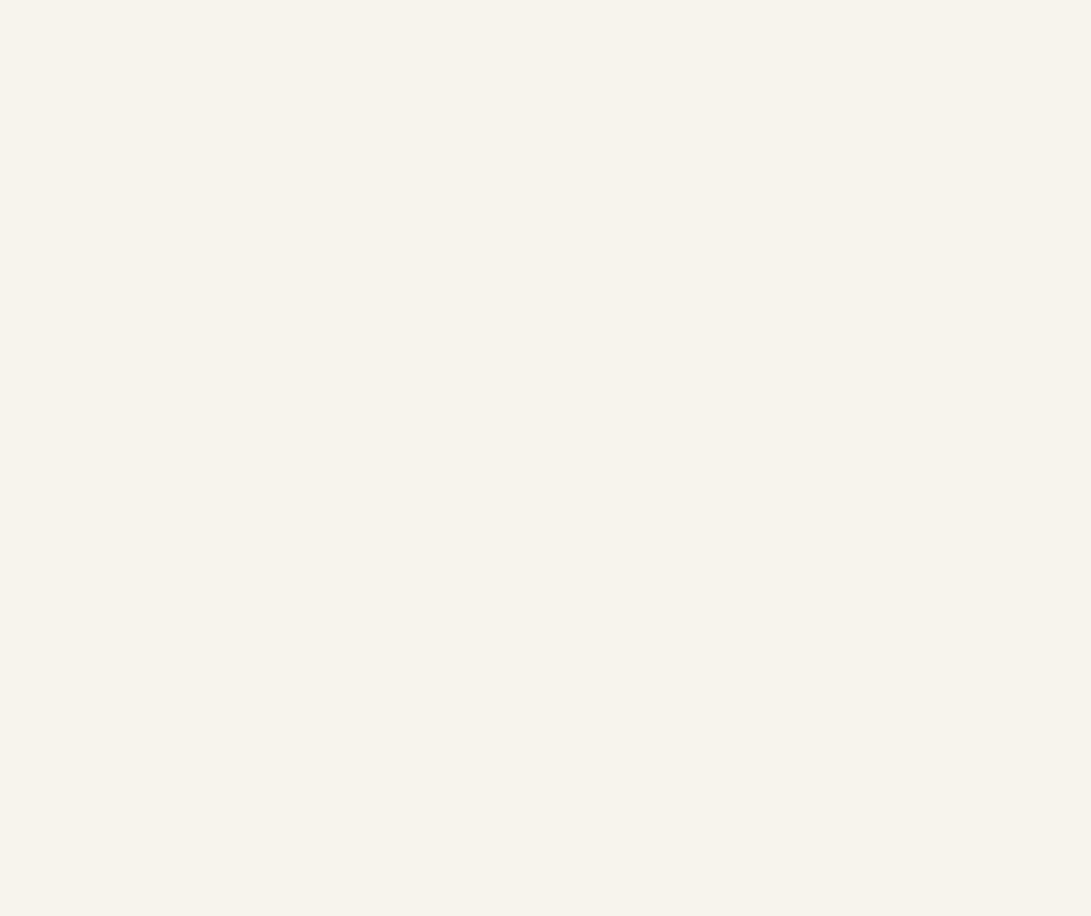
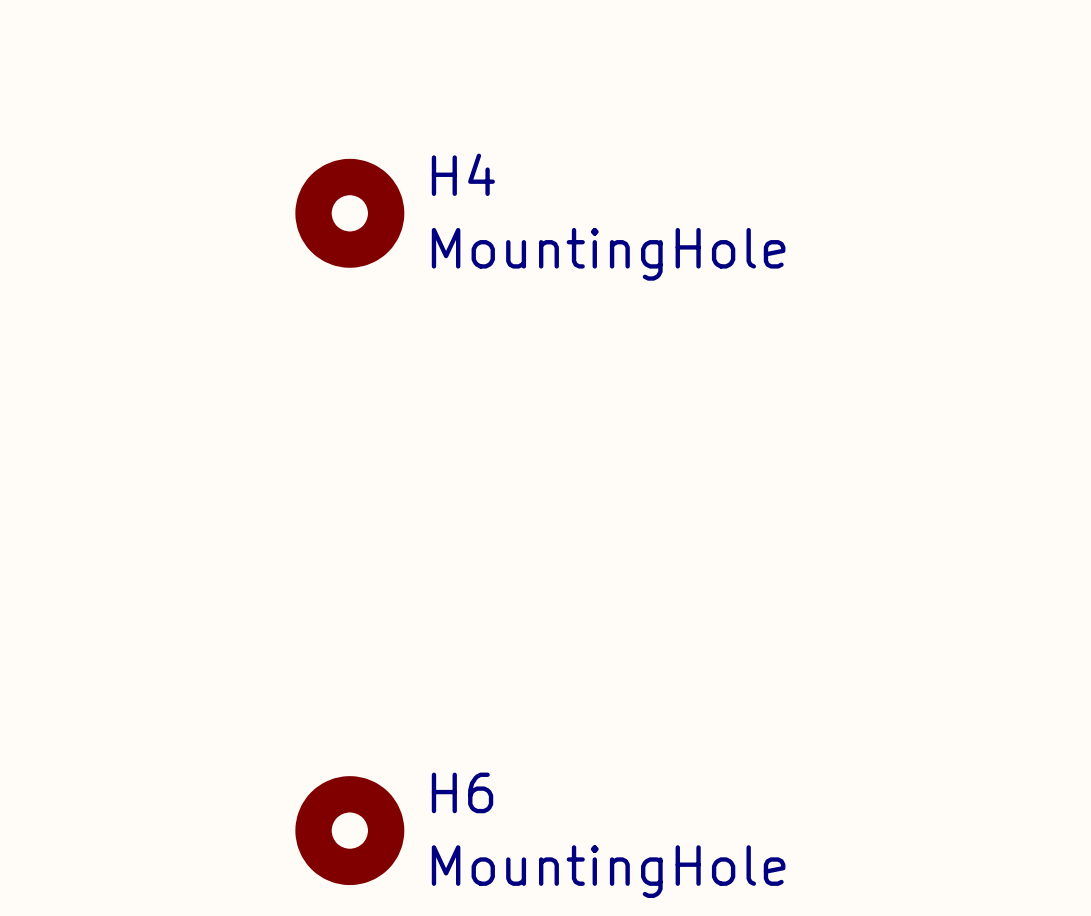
H4: none -> MountingHole (349, 213)
H6: none -> MountingHole (349, 830)

